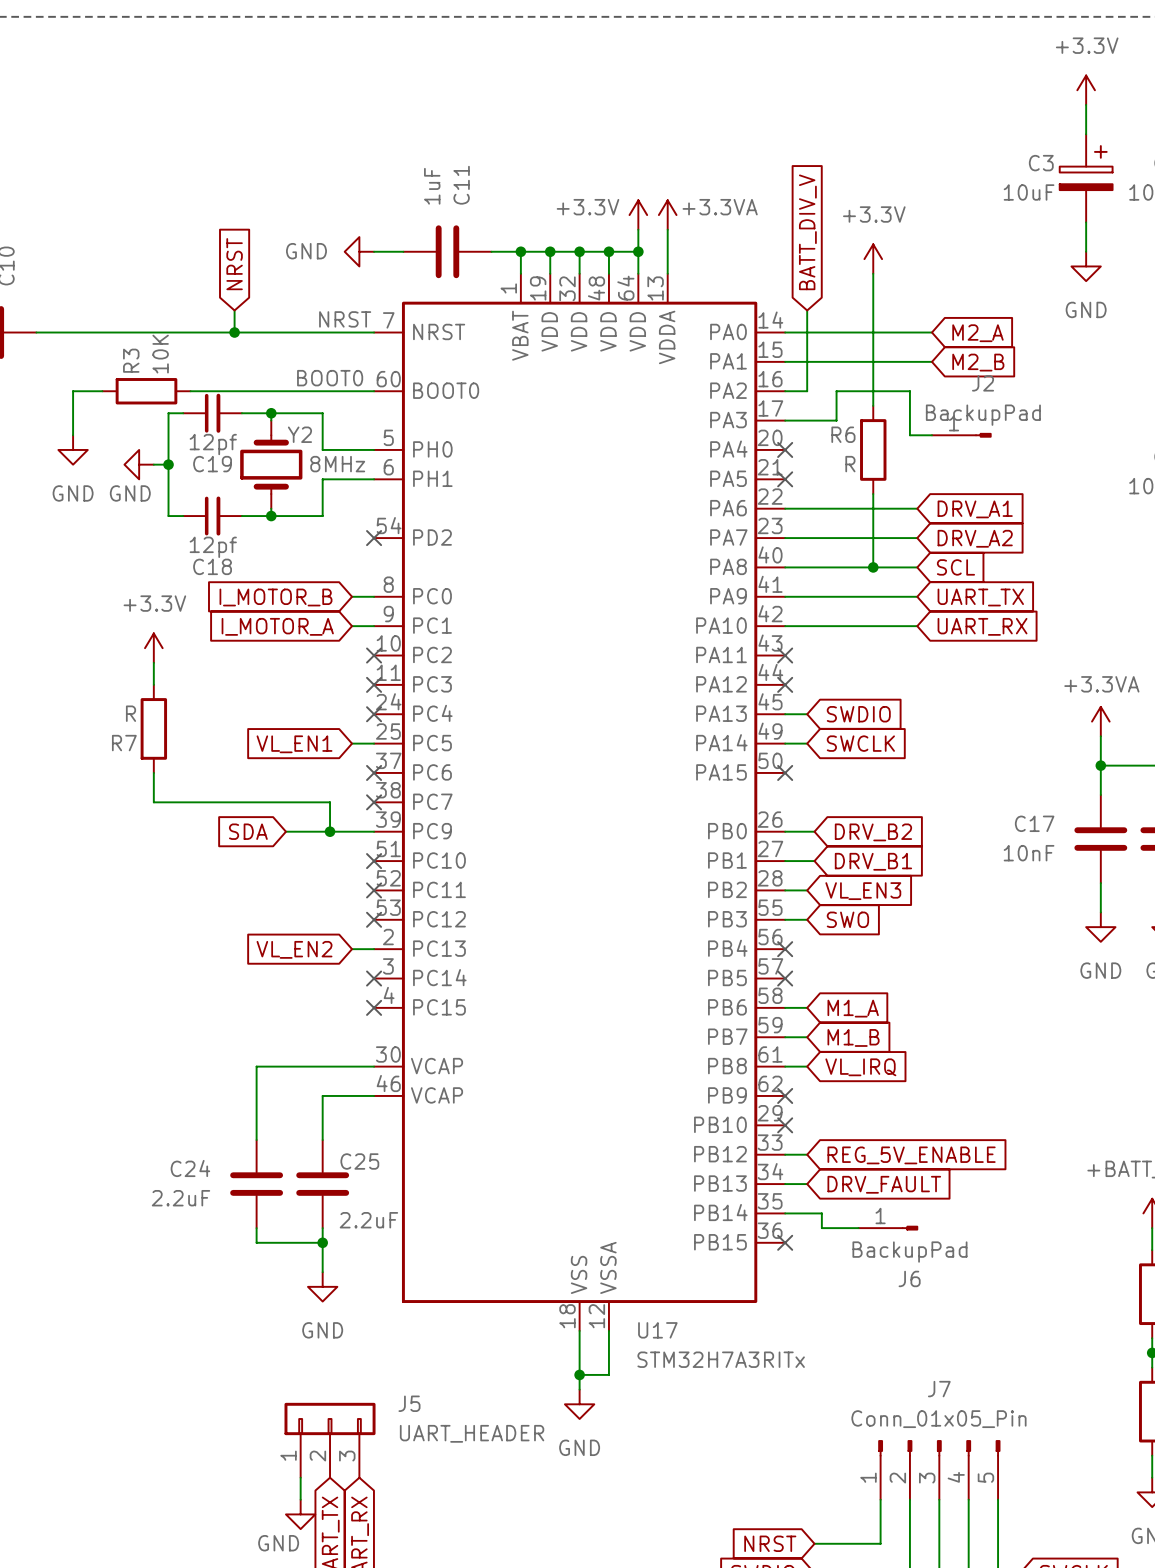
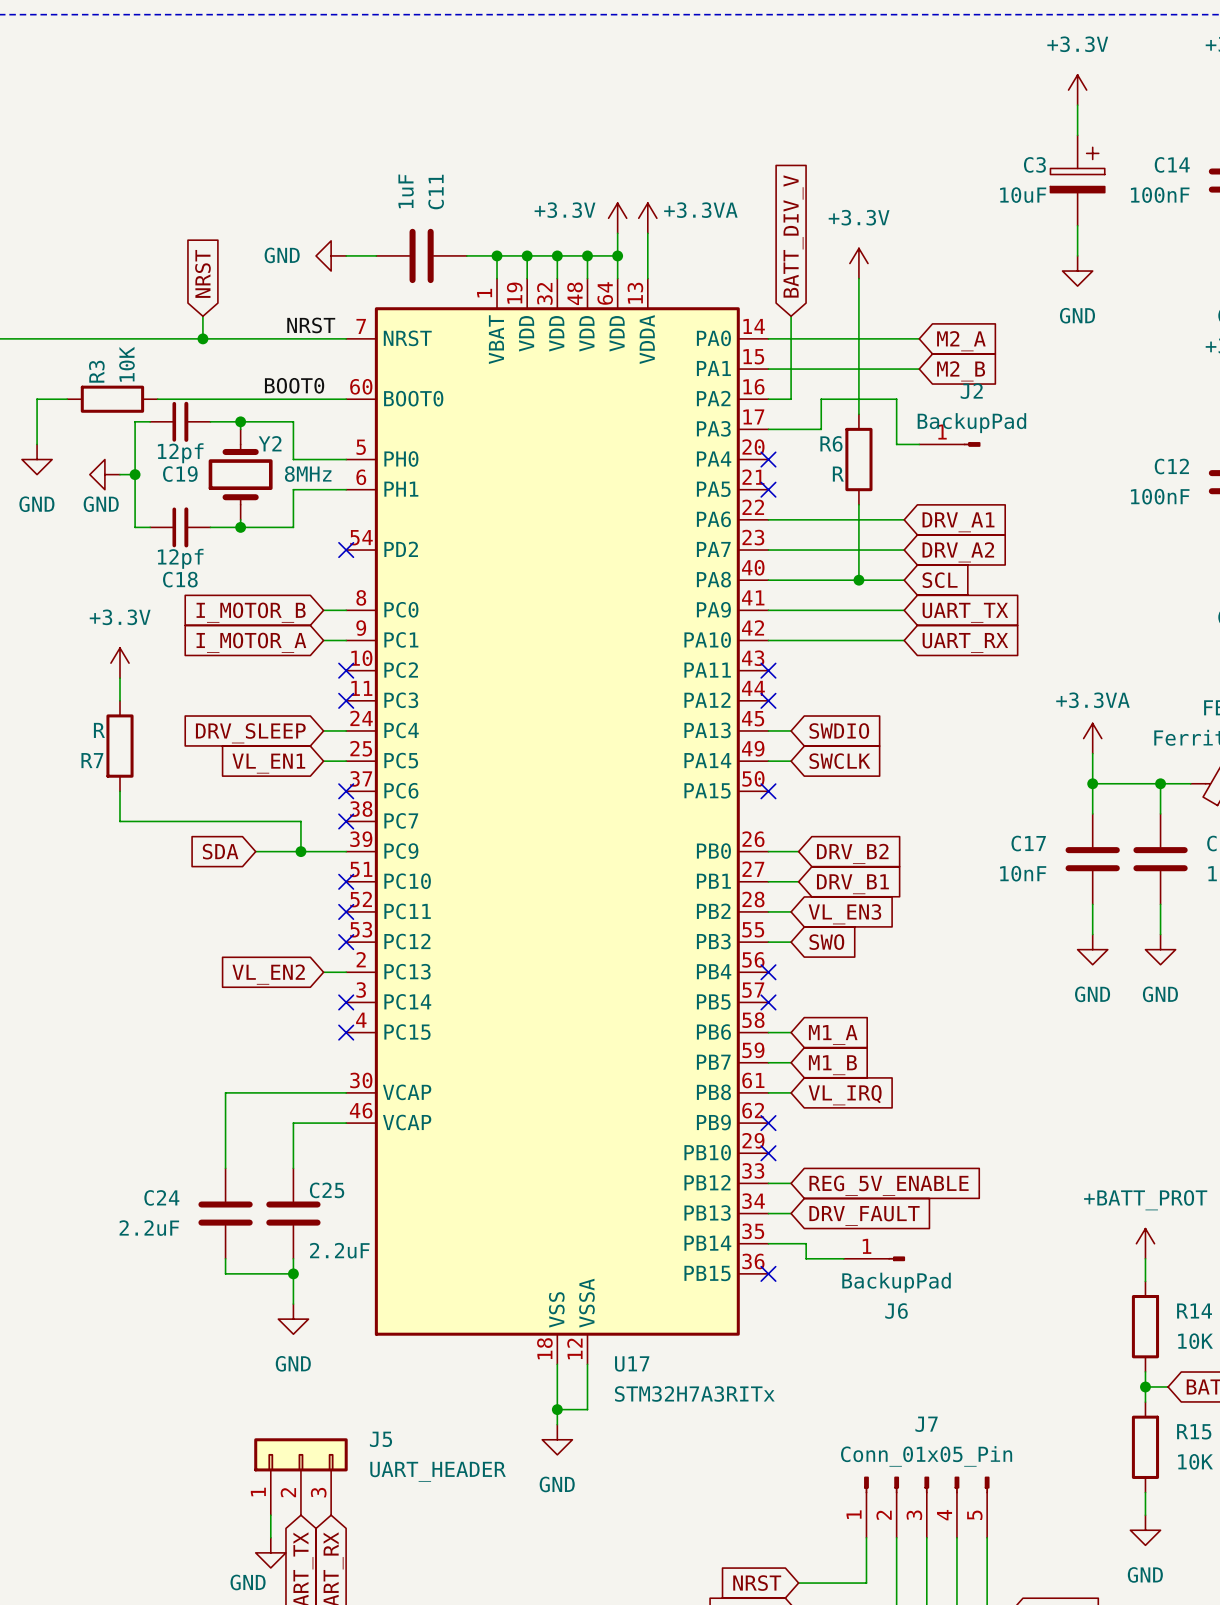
global label: none -> DRV_SLEEP (250, 733)
wire: none -> (323, 730) (346, 730)
no-connect mark: (374, 714) -> none

